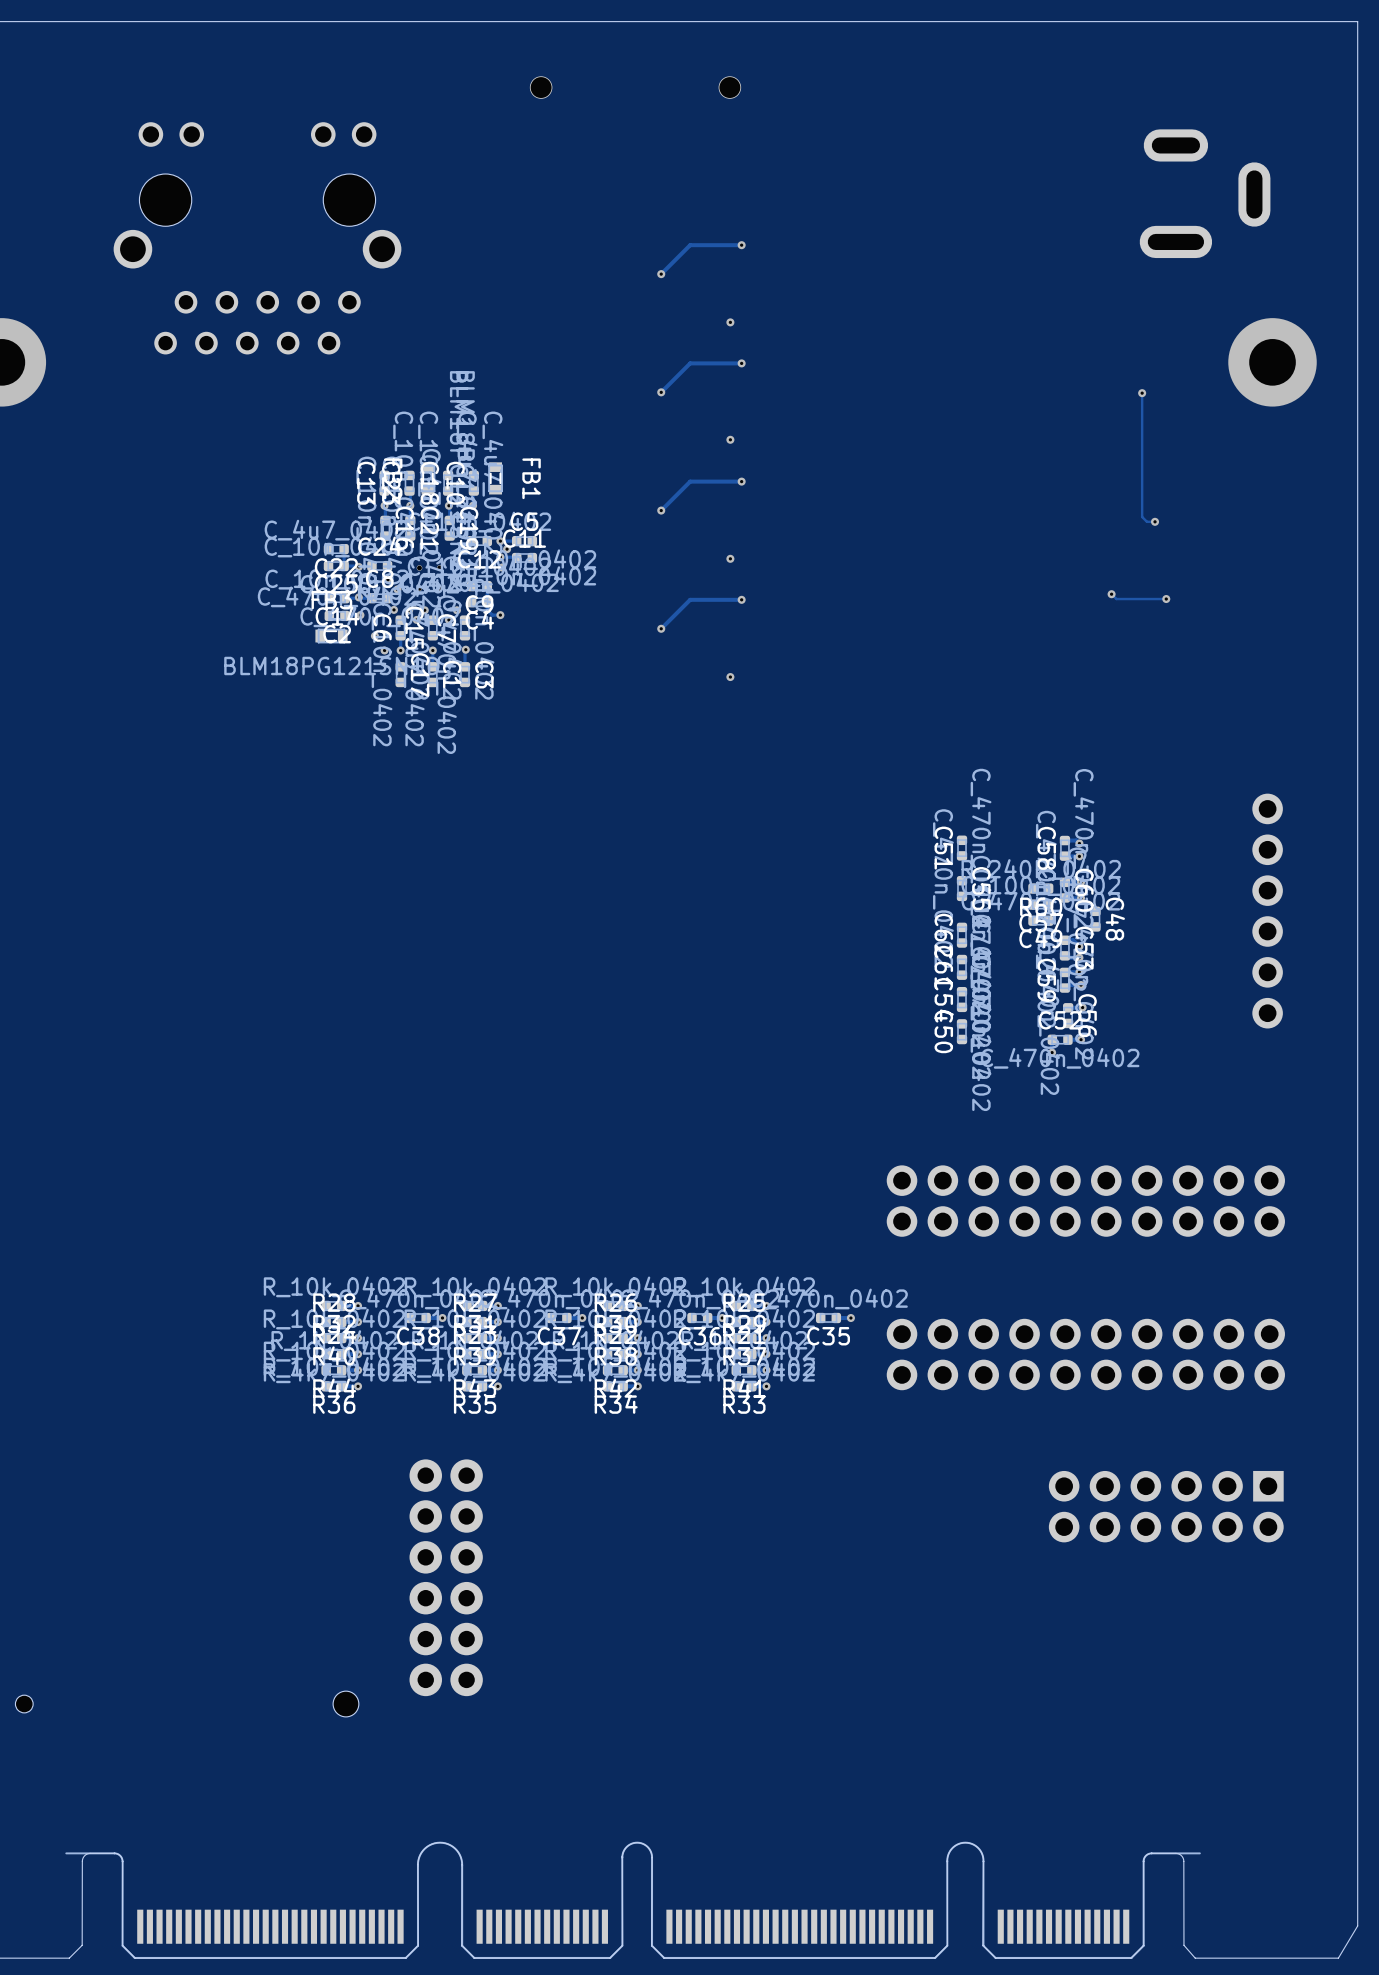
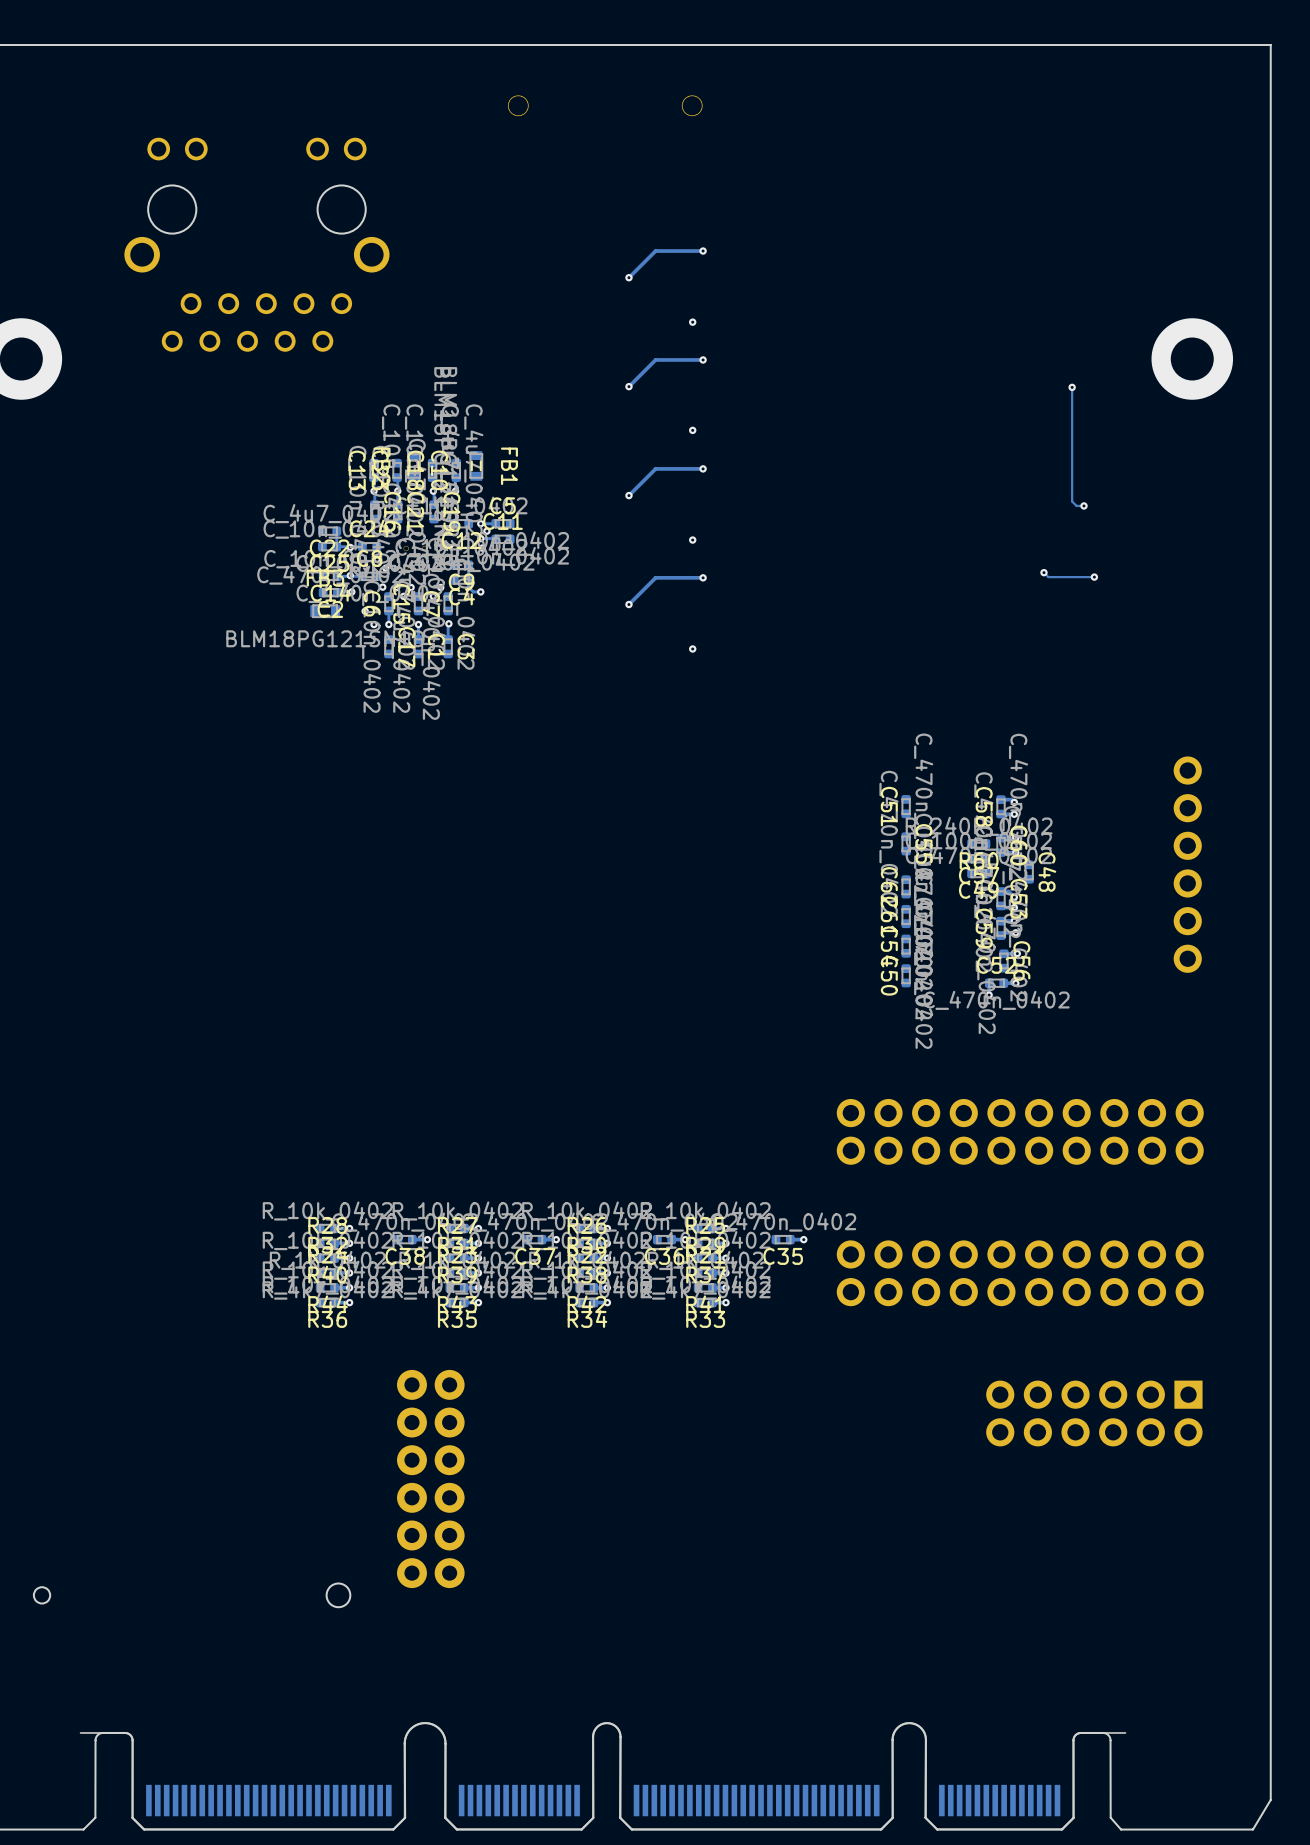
part: (1205, 193) -> none

